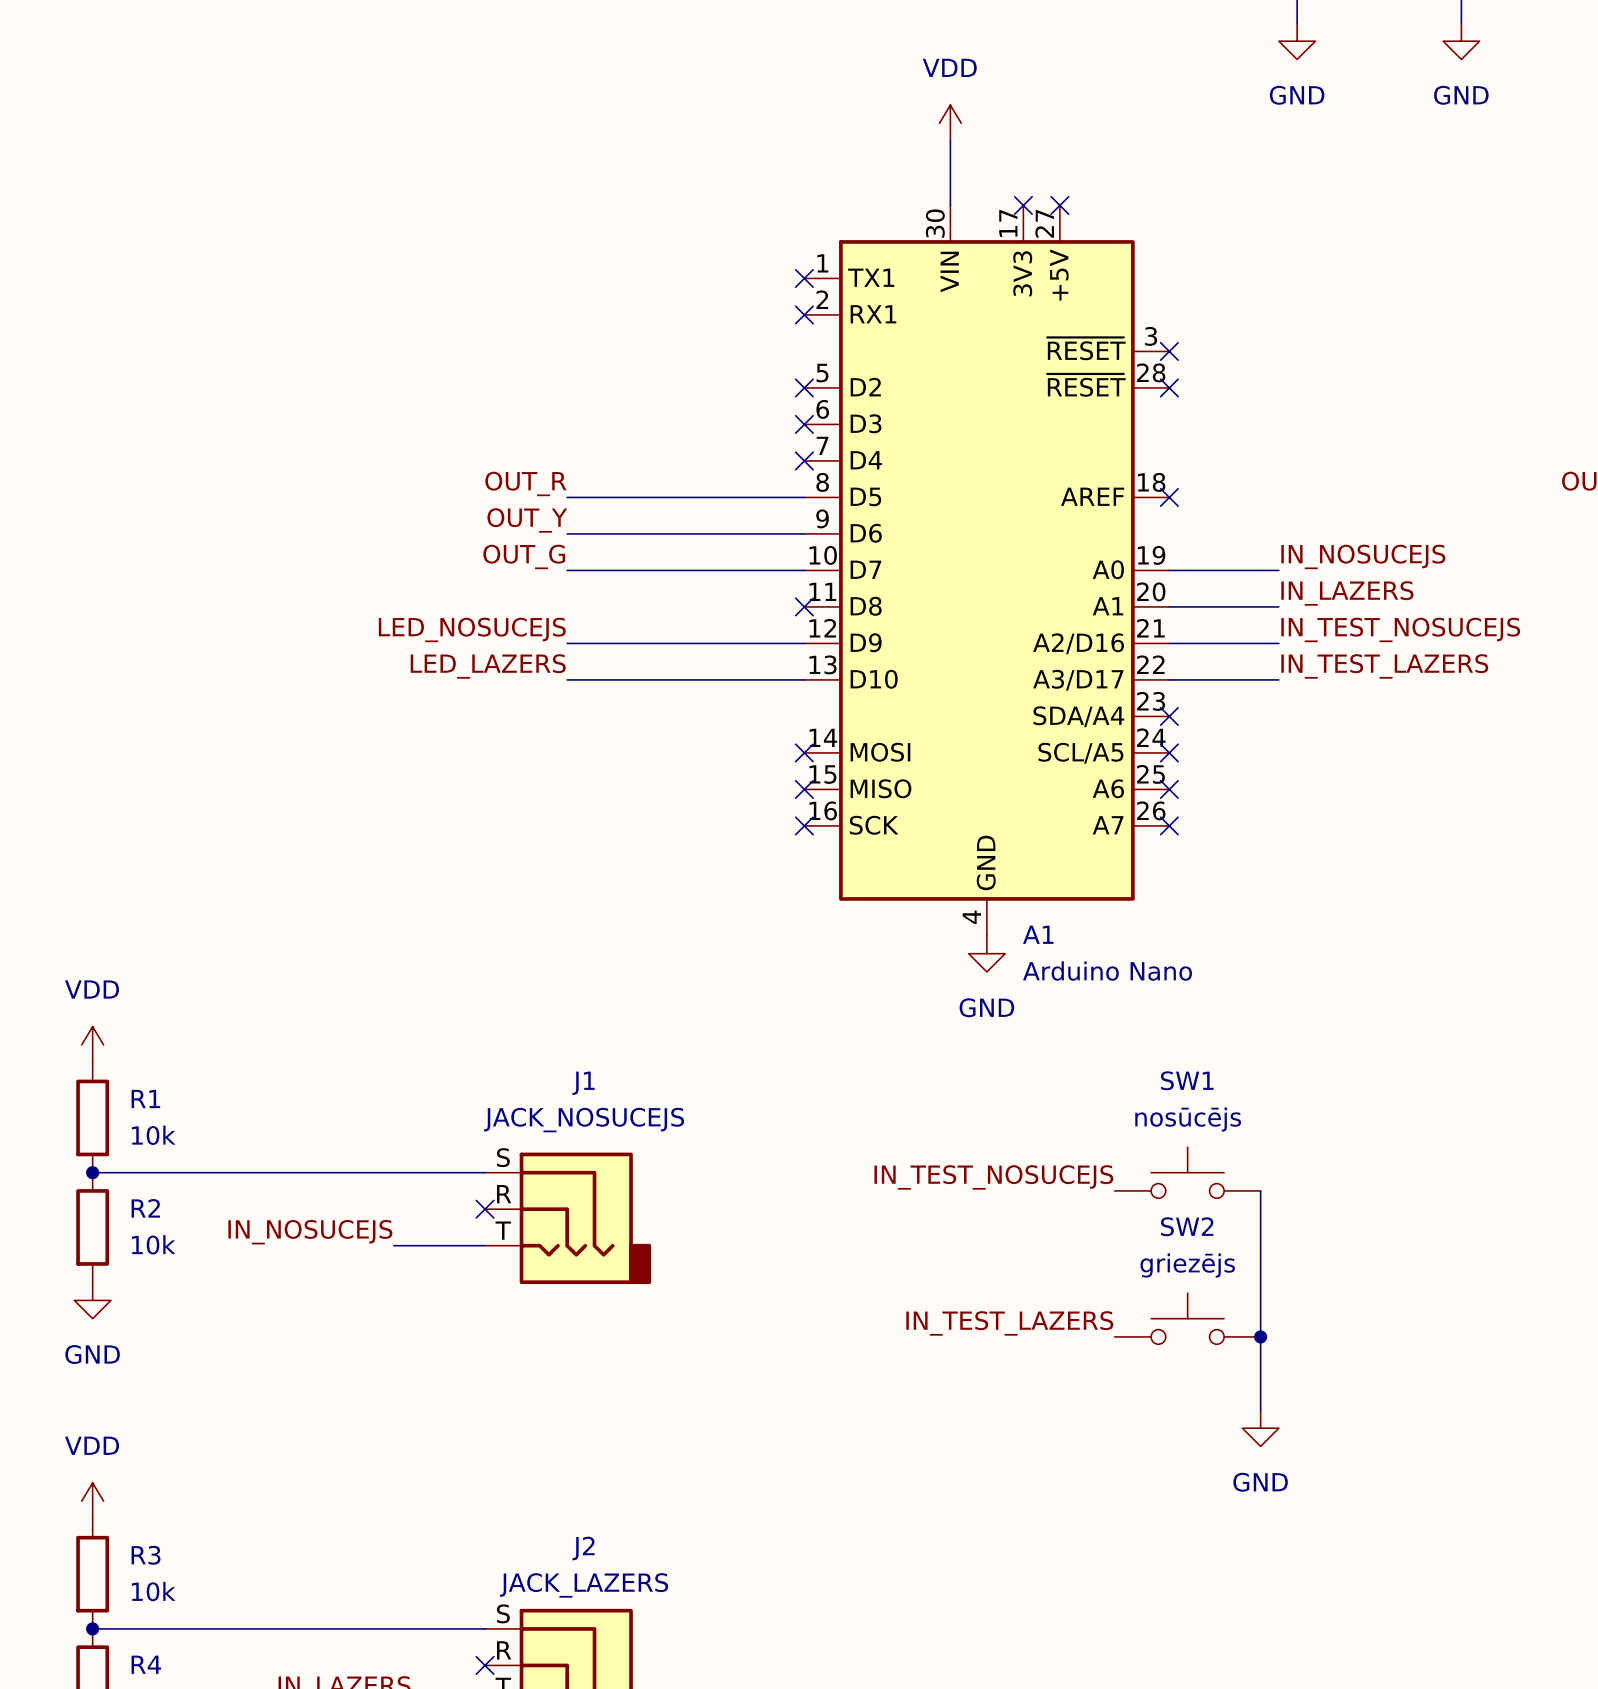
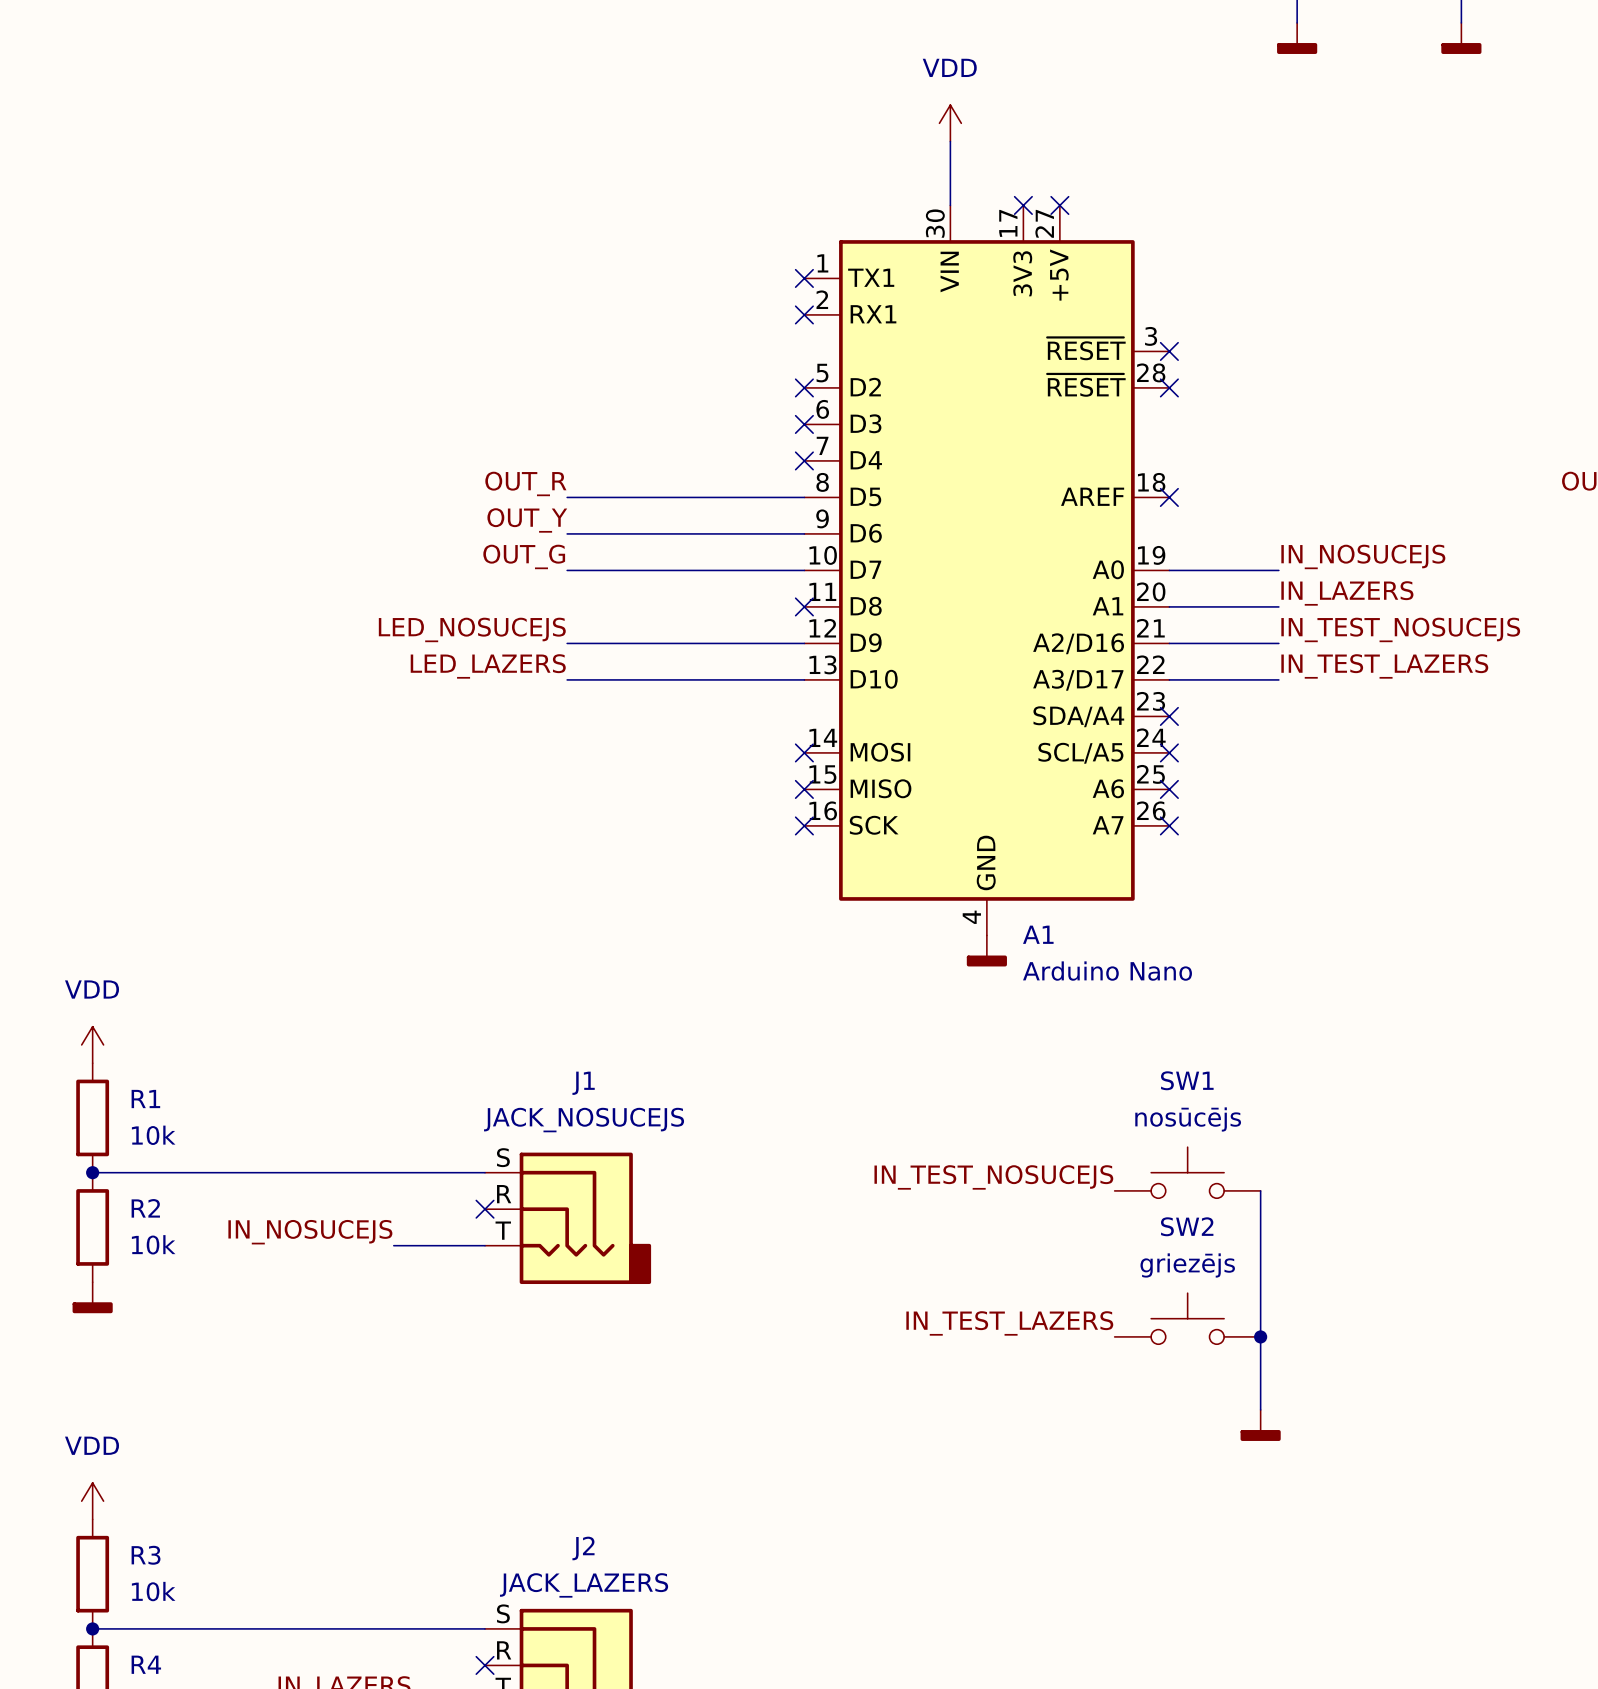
power symbol shape: [1278, 22, 1316, 60] -> [1277, 22, 1318, 54]
power symbol shape: [1443, 22, 1480, 60] -> [1441, 22, 1482, 54]
power symbol text: GND (1297, 95) -> none
power symbol text: GND (1461, 95) -> none
power symbol shape: [968, 935, 1006, 972] -> [966, 935, 1007, 967]
power symbol text: GND (986, 1007) -> none
power symbol shape: [74, 1282, 111, 1319] -> [72, 1282, 113, 1314]
power symbol text: GND (92, 1354) -> none
power symbol shape: [1242, 1409, 1279, 1447] -> [1240, 1409, 1281, 1441]
power symbol text: GND (1260, 1482) -> none

